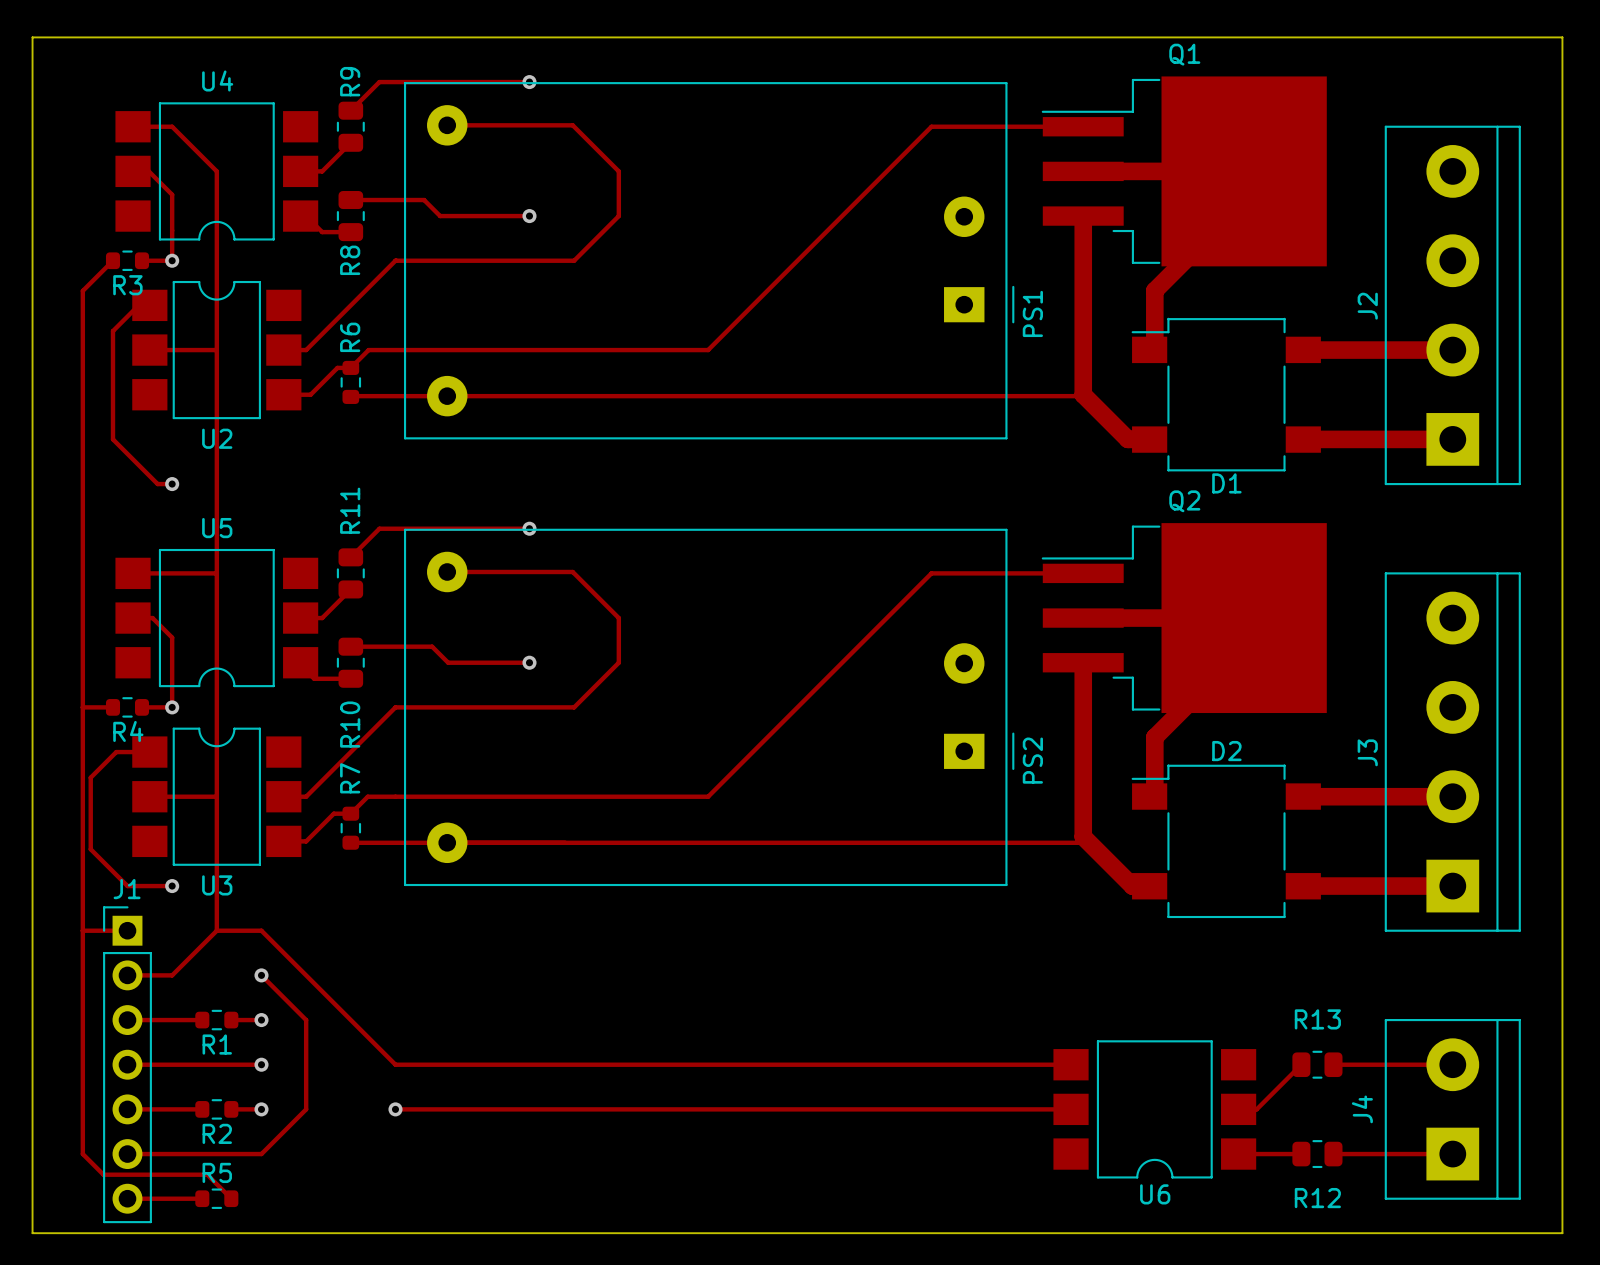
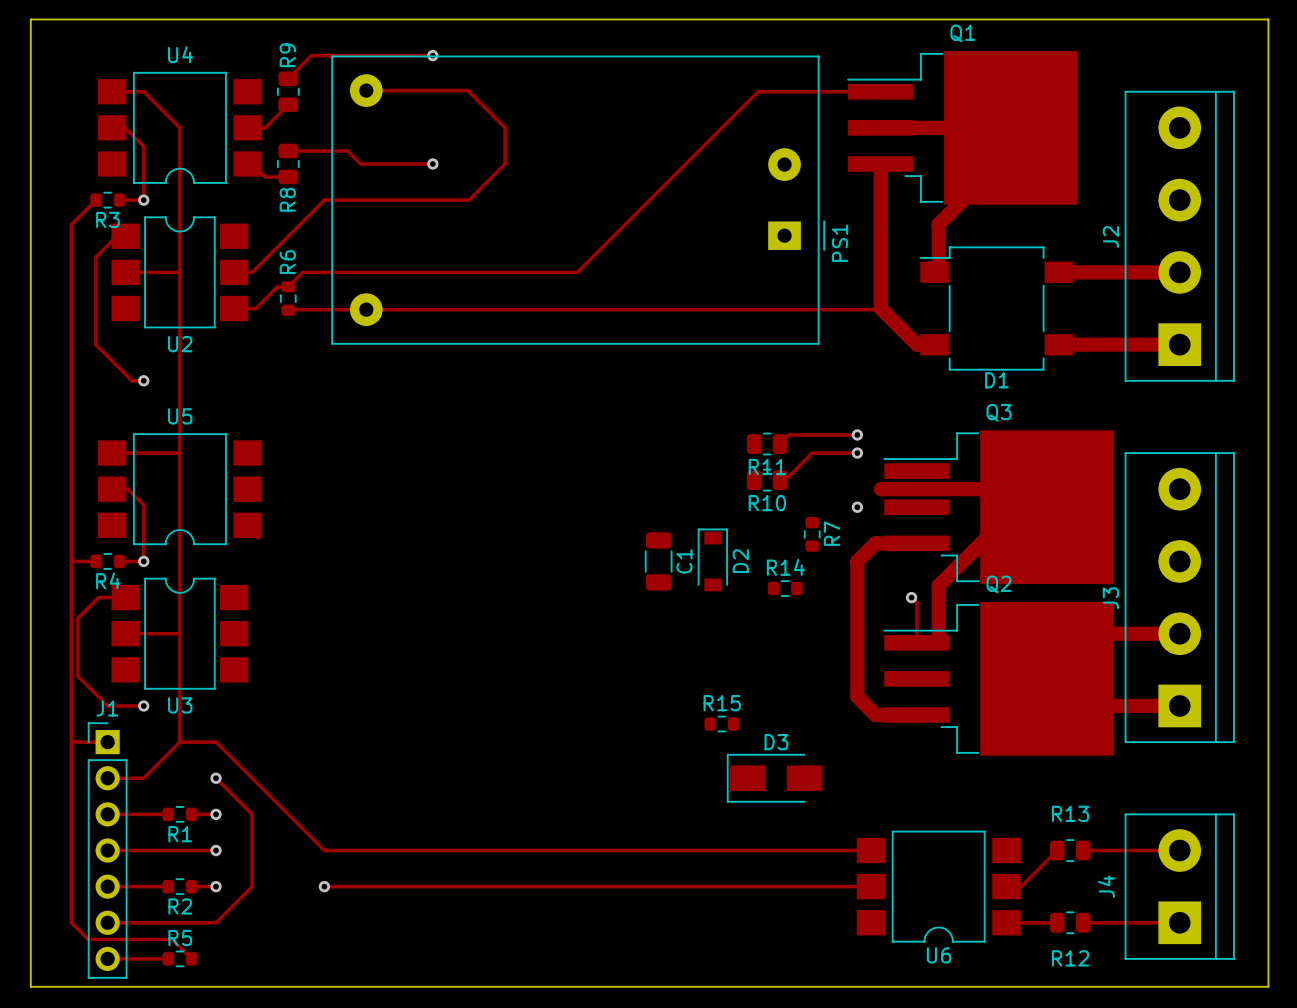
R11 name position: R11 (350, 510) -> R11 (767, 466)
track: (529, 528) (379, 528) (350, 557) -> none
via: (529, 528) -> none
track: none -> (857, 434) (789, 434) (780, 444)
via: none -> (857, 434)
track: (447, 571) (572, 571) (618, 618) (618, 662) (574, 707) (395, 707) (306, 796) (283, 796) -> none
R11 rotation: 0° (350, 573) -> 90° clockwise (767, 444)
R11 position: (350, 573) -> (767, 444)
track: (998, 573) (931, 573) (708, 796) (367, 796) (350, 813) (333, 813) (306, 841) (283, 841) -> (812, 453) (785, 480) (780, 480)
via: none -> (857, 453)
track: (350, 589) (322, 618) (300, 618) -> none
Q2 position: (1184, 618) -> (998, 678)
via: none -> (857, 507)
Q3: none -> (998, 507)
track: (350, 646) (432, 646) (448, 662) (529, 662) -> none
R10 rotation: 0° (350, 662) -> 90° clockwise (767, 480)
R10 position: (350, 662) -> (767, 480)
via: (529, 662) -> none
track: (1083, 662) (1083, 836) -> none
track: (314, 678) (350, 678) -> none
track: none -> (916, 543) (875, 543) (857, 561) (857, 696) (875, 715) (916, 715)
PS2: (709, 707) -> none
C1: none -> (658, 561)
R14: none -> (785, 588)
D2 name position: D2 (1226, 751) -> D2 (740, 561)
track: none -> (911, 597) (916, 602) (916, 642)
via: none -> (911, 597)
D2 footprint: [1131, 764, 1321, 919] -> [697, 528, 728, 592]
R7 name position: R7 (350, 778) -> R7 (832, 533)
R7 position: (350, 828) -> (812, 534)
track: (1083, 836) (1132, 886) (1149, 886) -> none
track: (1083, 836) (1077, 842) (350, 842) -> none
R15: none -> (721, 724)
D3: none -> (774, 778)

